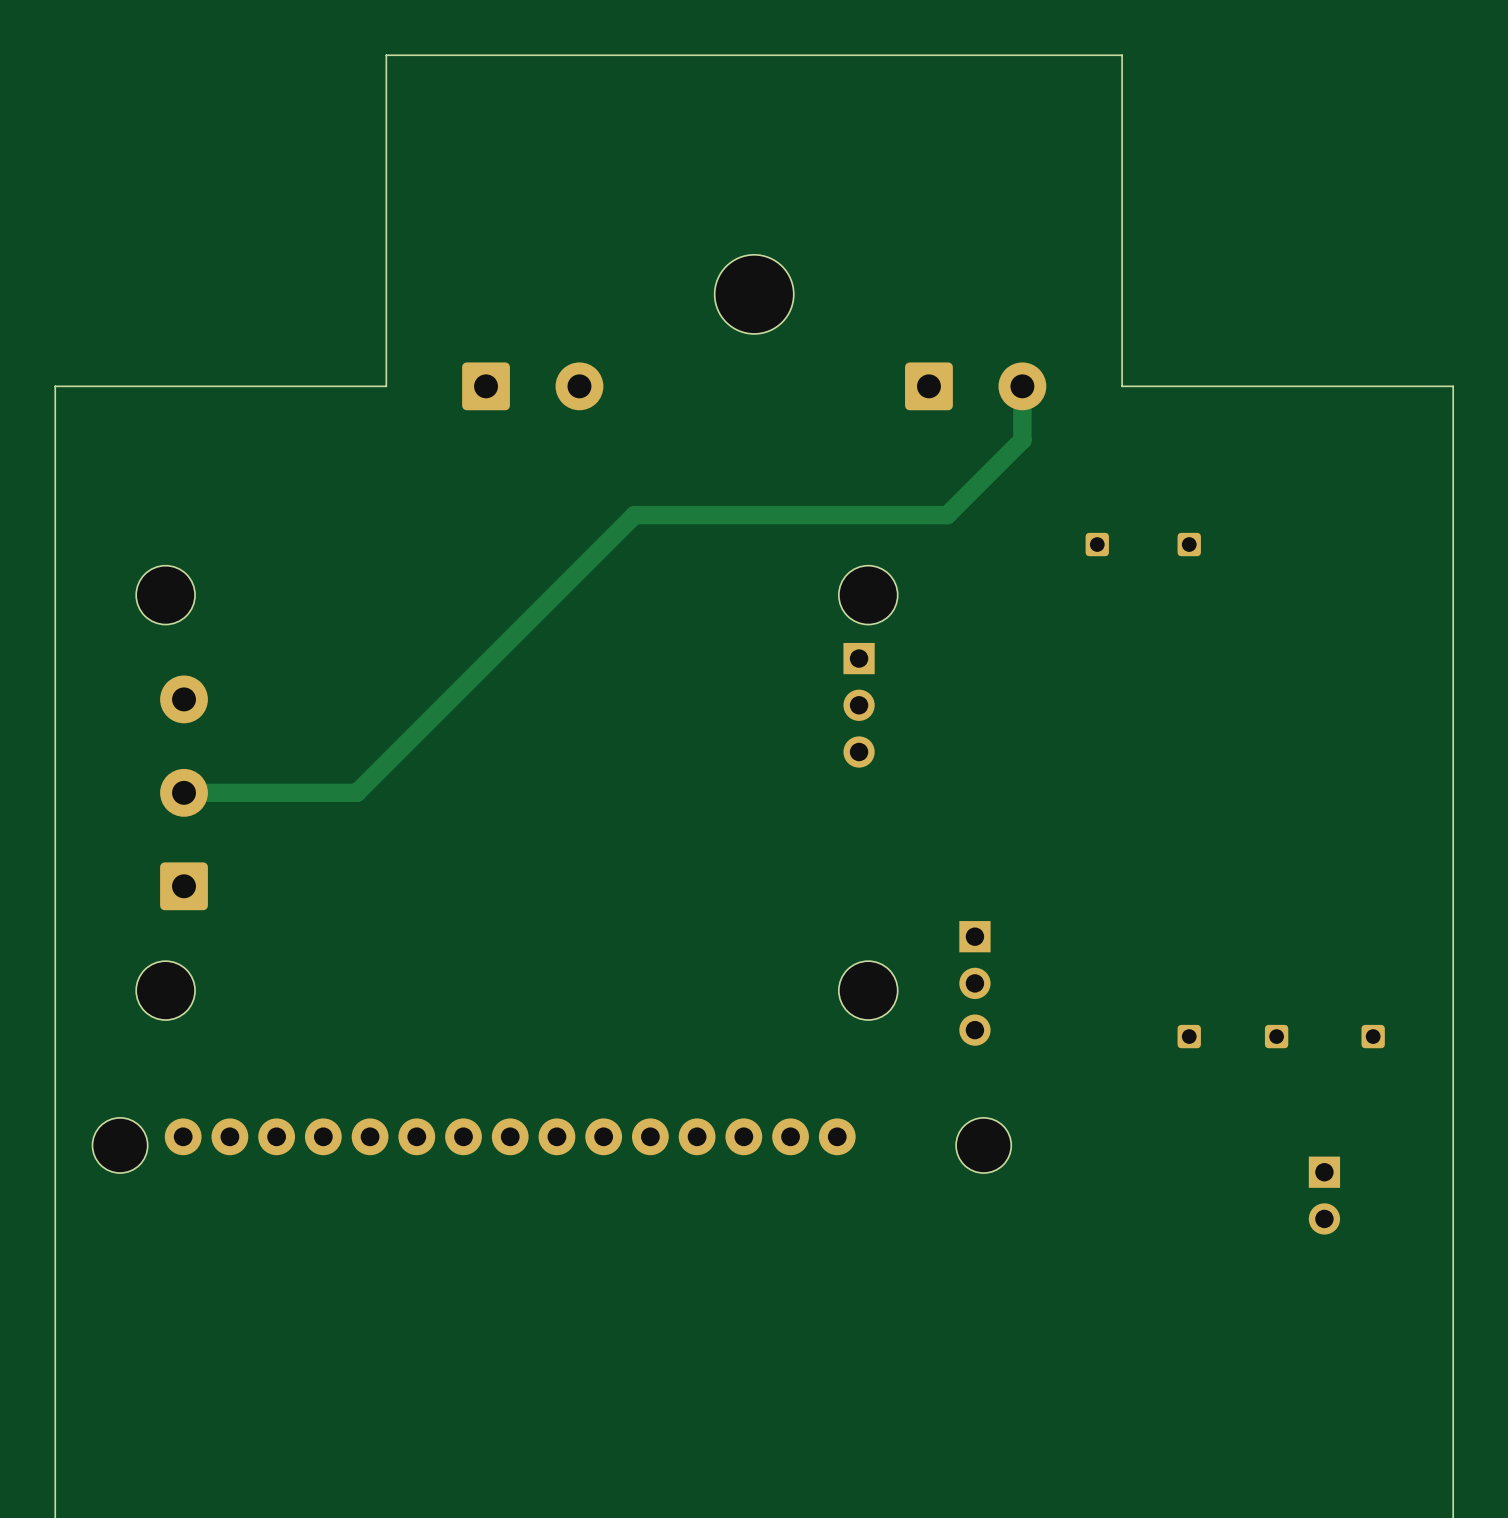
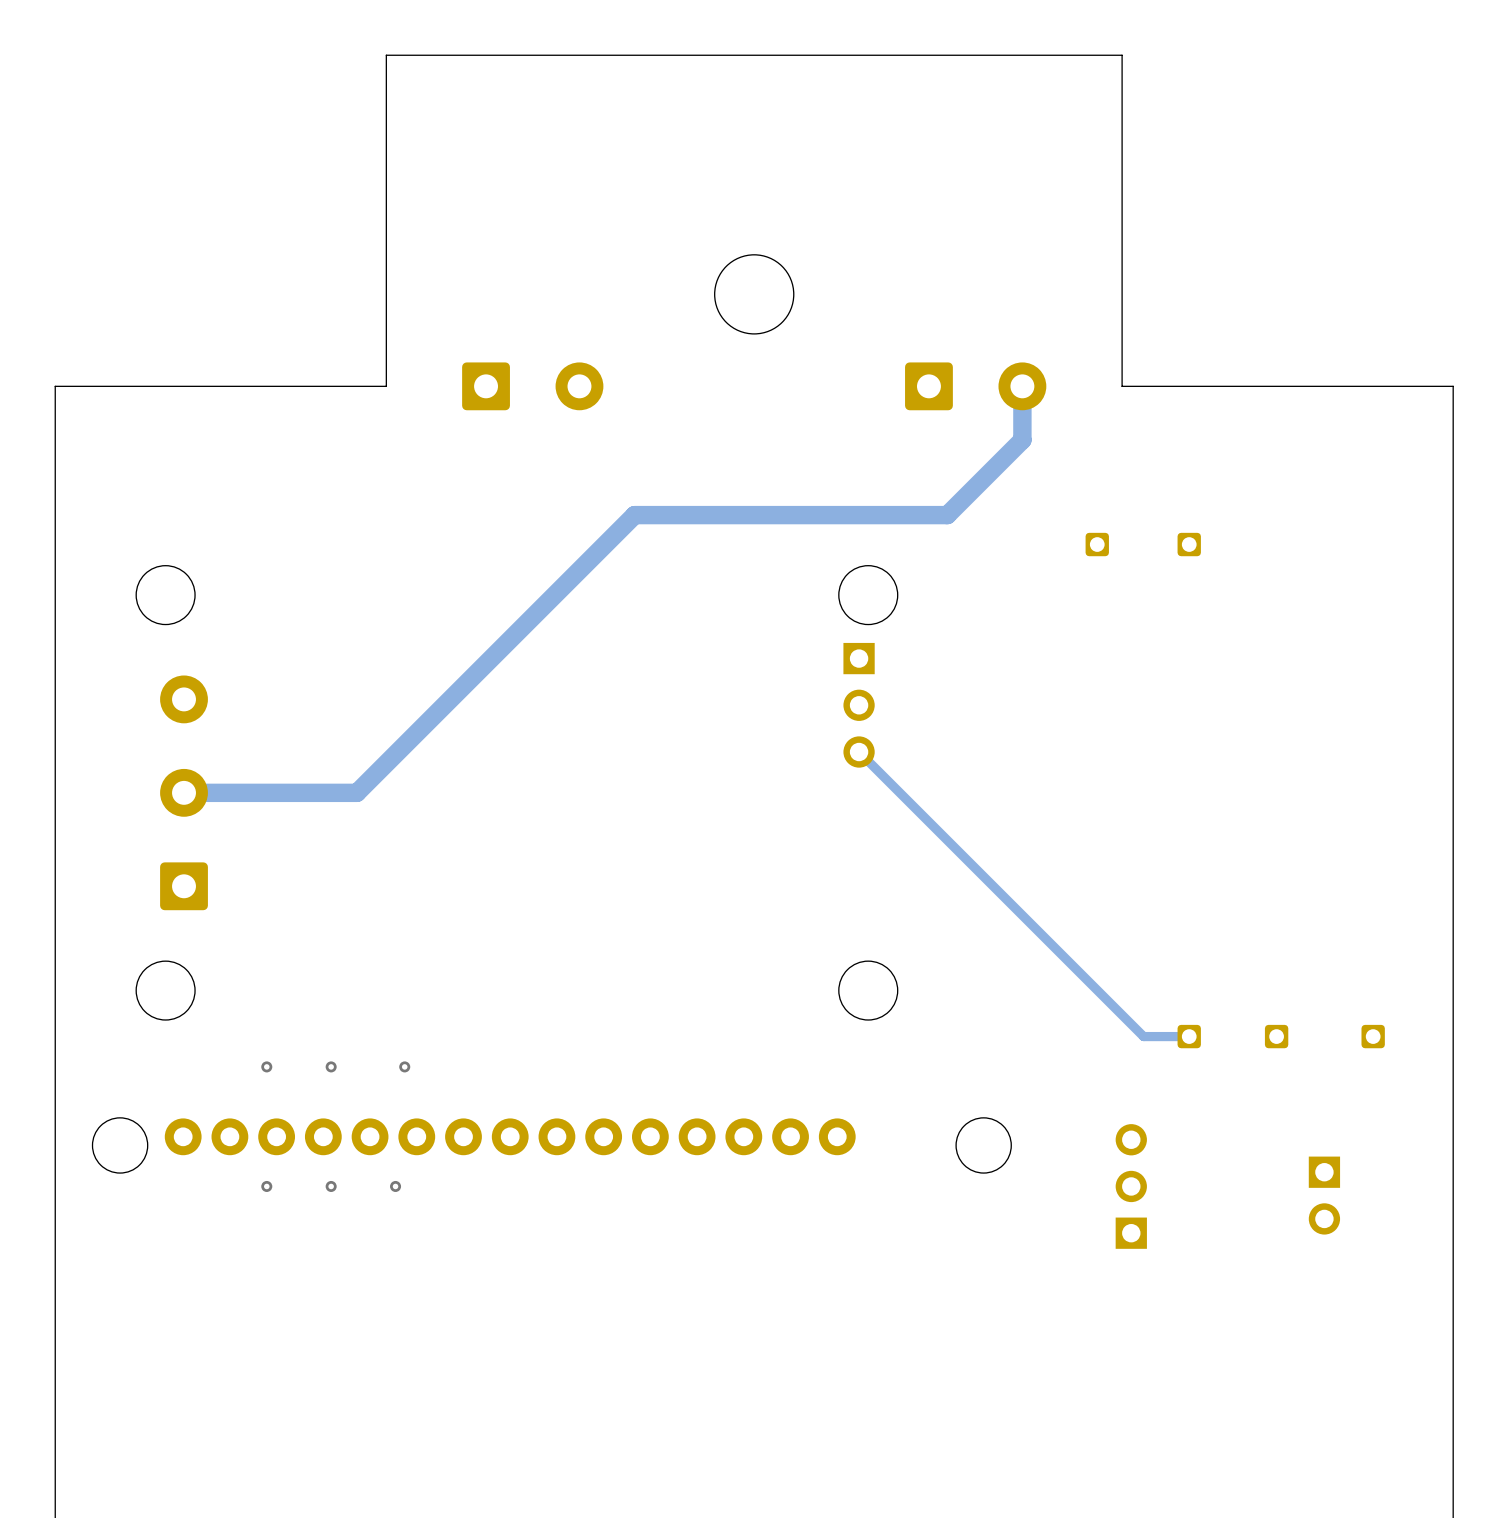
track: none -> (859, 752) (1143, 1036) (1189, 1036)
part rotation: 0° (974, 983) -> 180° (1131, 1186)
part position: (974, 983) -> (1131, 1186)
via: none -> (266, 1066)
via: none -> (331, 1066)
via: none -> (404, 1066)
via: none -> (266, 1186)
via: none -> (331, 1186)
via: none -> (395, 1186)

